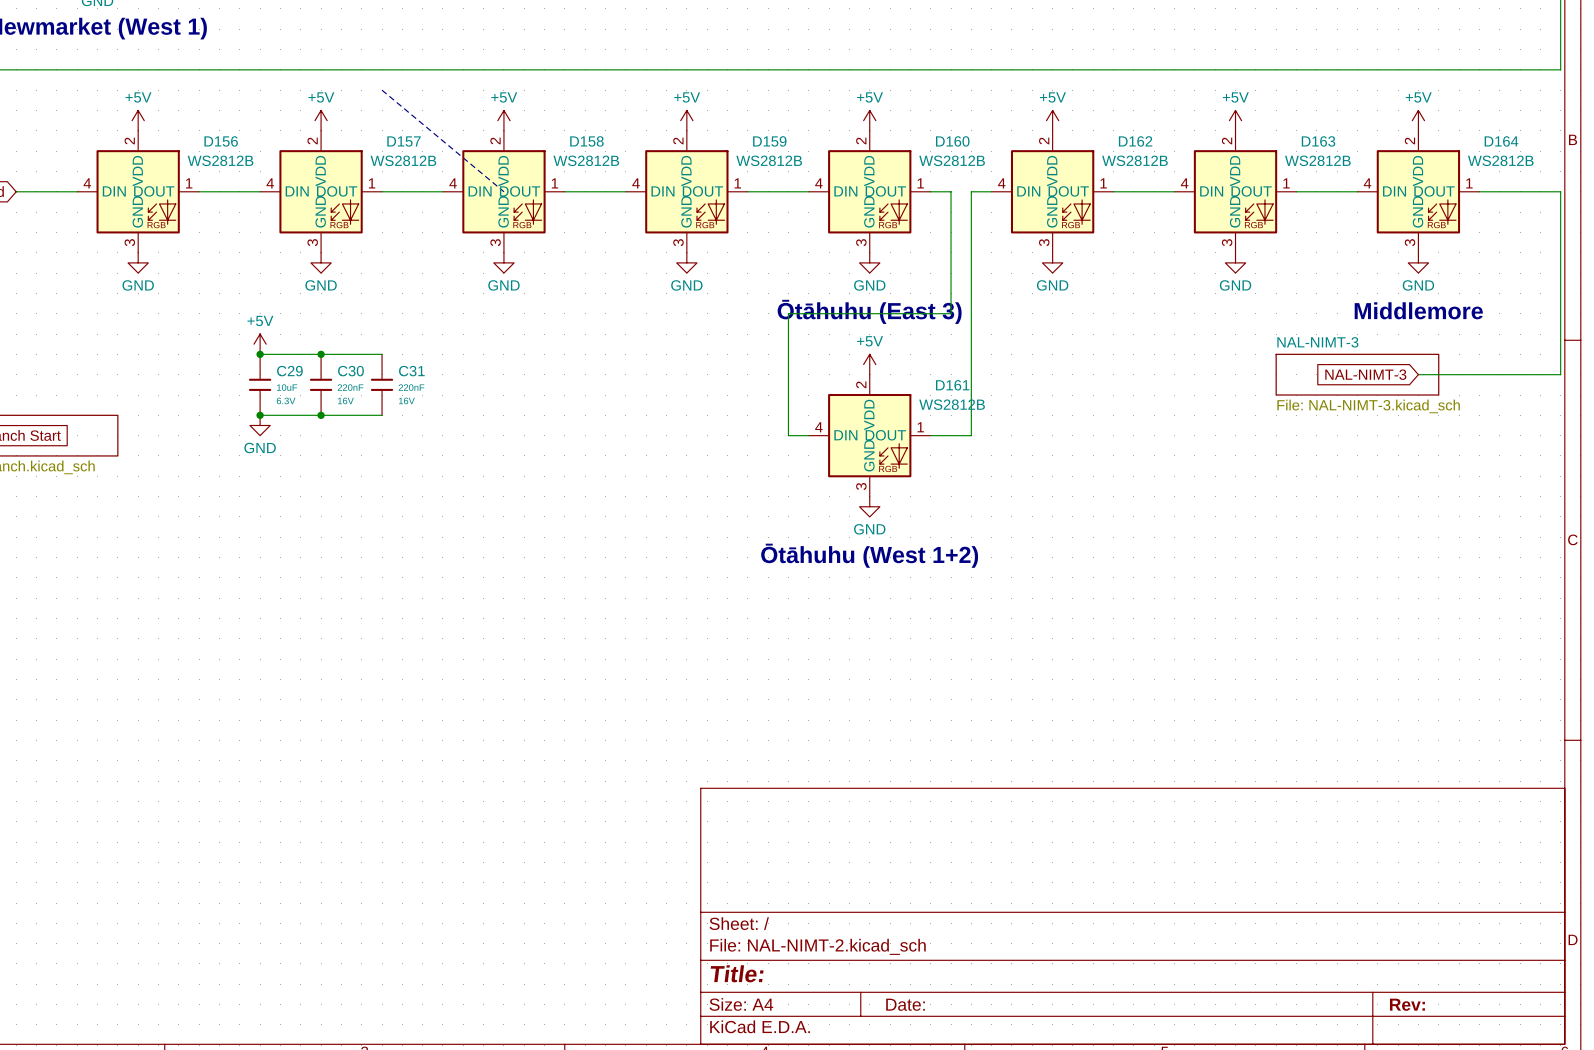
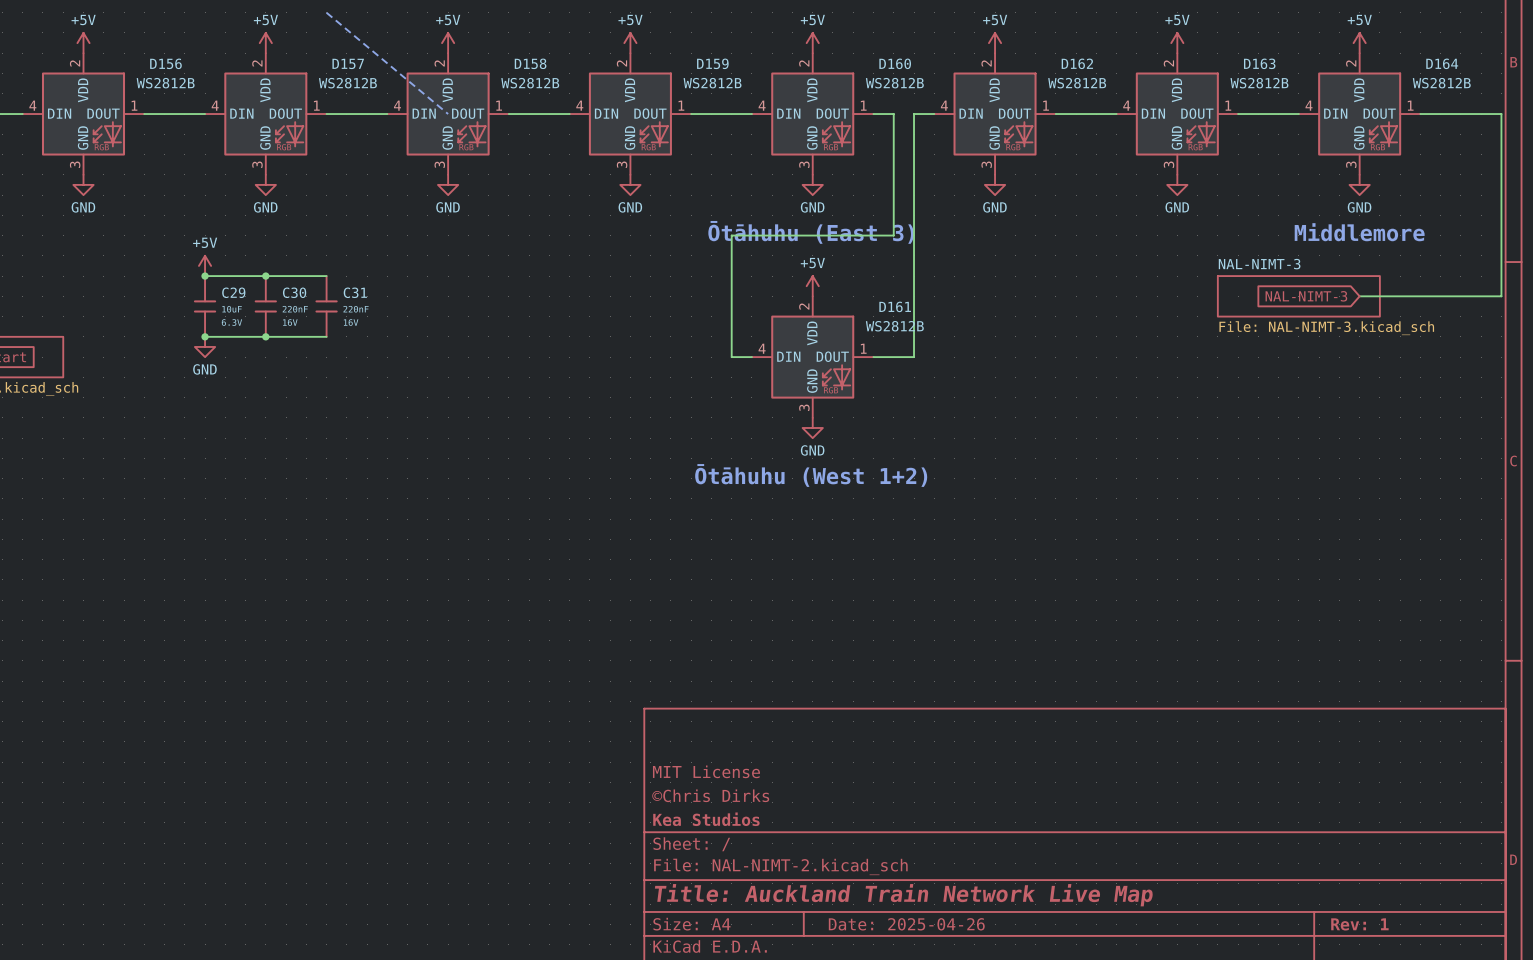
title block: none -> MIT License (706, 771)
title block: none -> ©Chris Dirks (710, 795)
title block: none -> Kea Studios (706, 819)
title block: Title: (737, 973) -> Title: Auckland Train Network Live Map (903, 895)
title block: Date: (905, 1004) -> Date: 2025-04-26 (906, 924)
title block: Rev: (1407, 1004) -> Rev: 1 (1359, 924)

